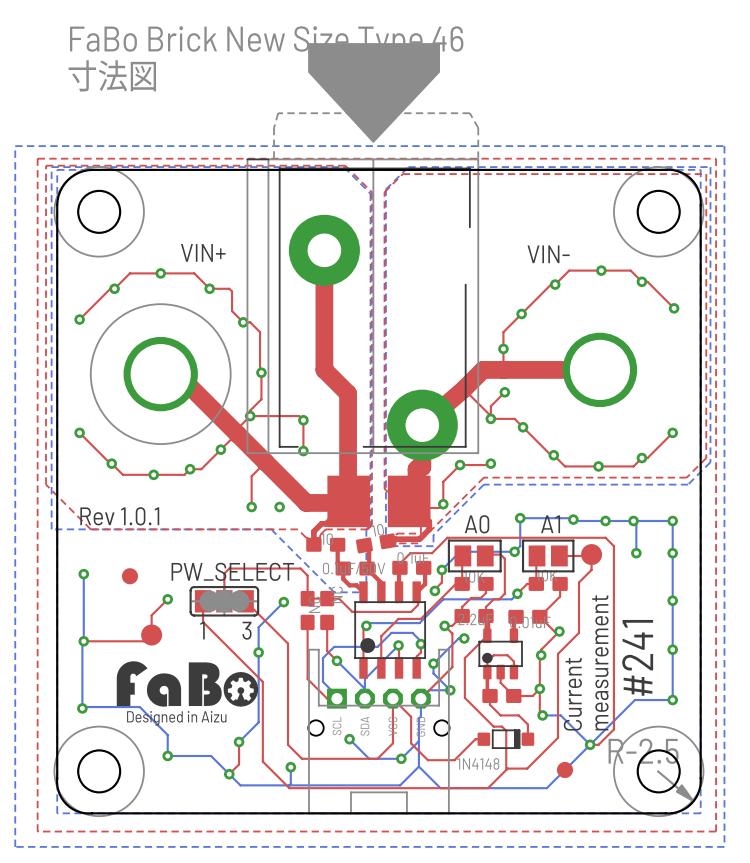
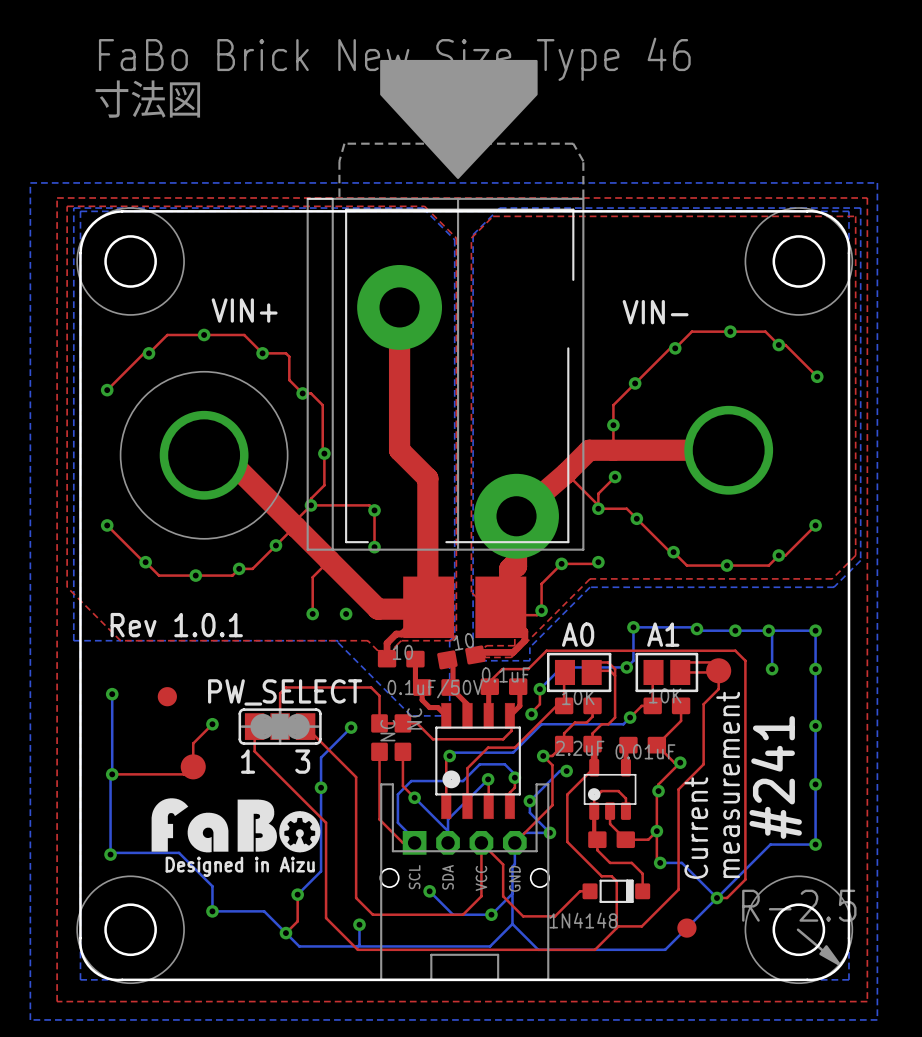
top track: none -> (600, 662) (608, 662) (615, 669) (615, 675)
top track: none -> (686, 662) (710, 662)

